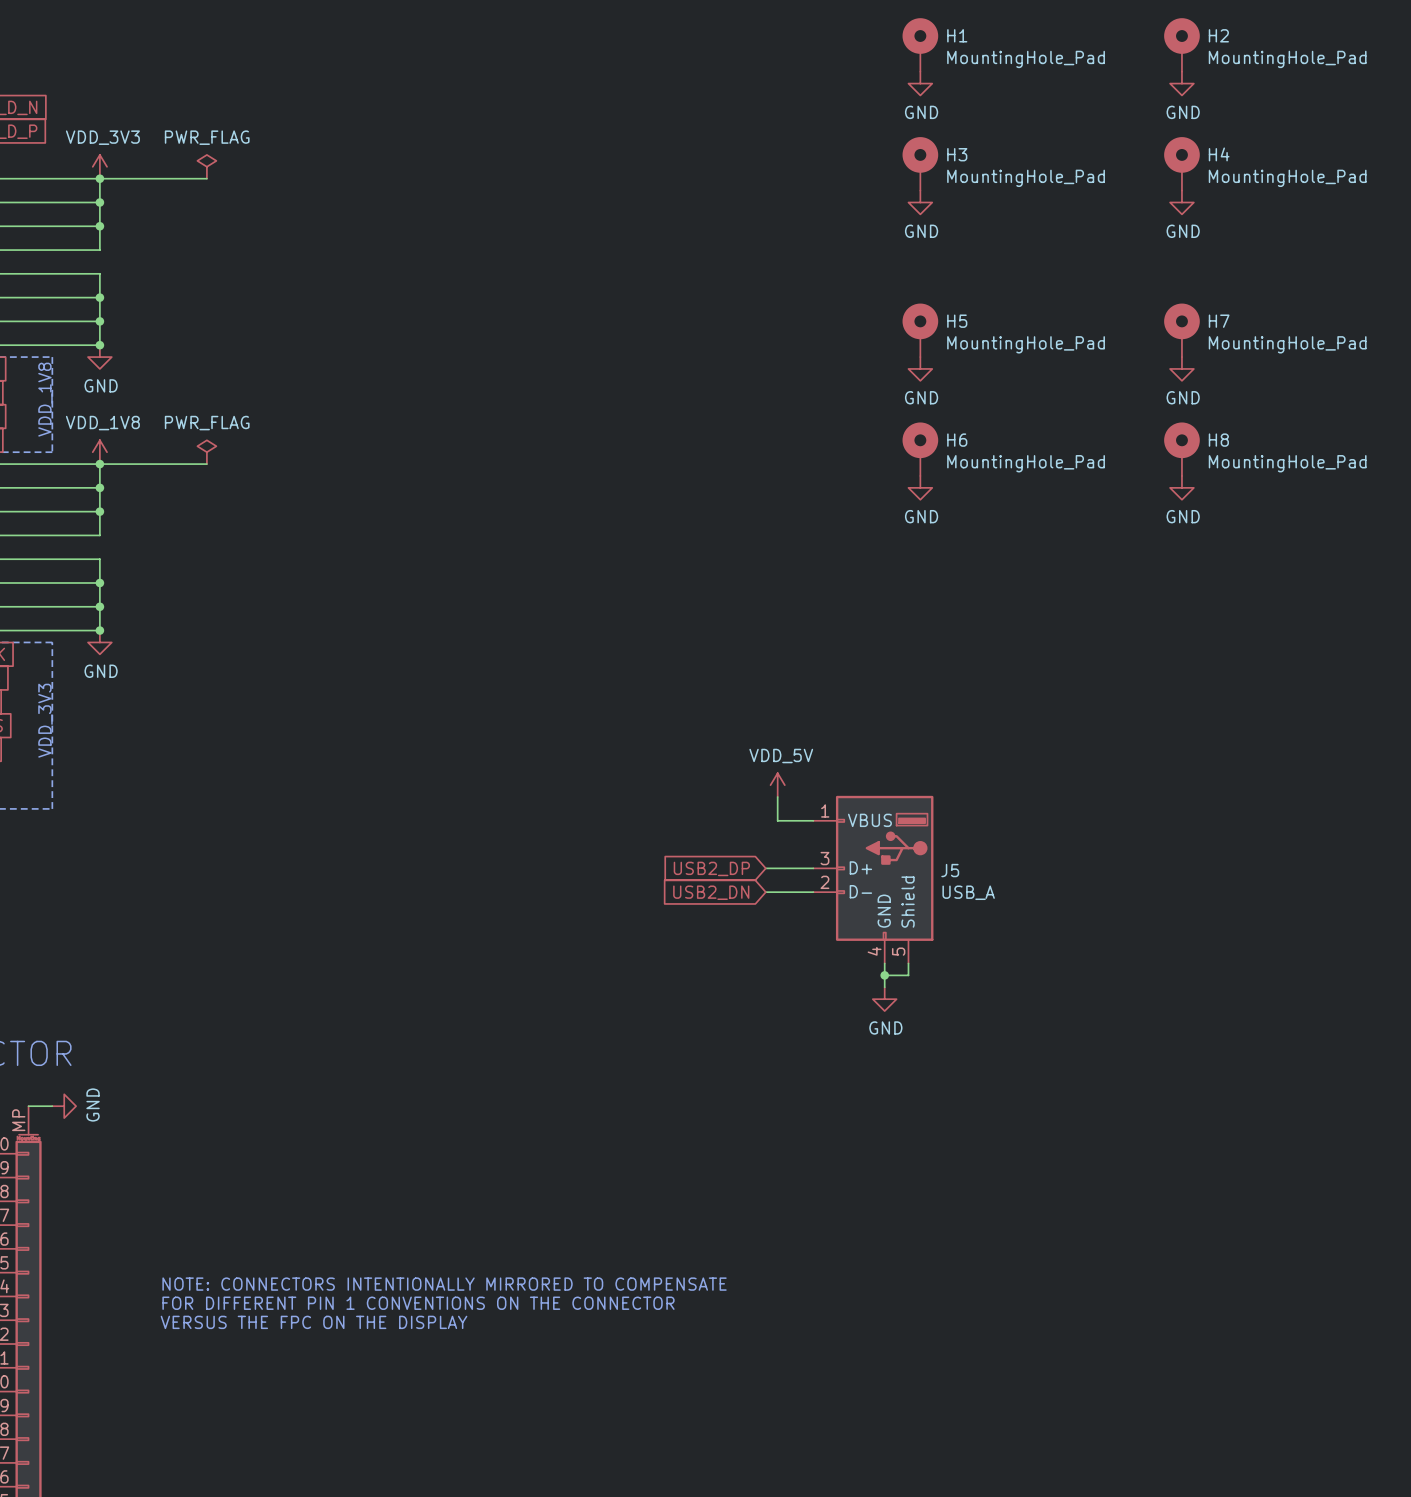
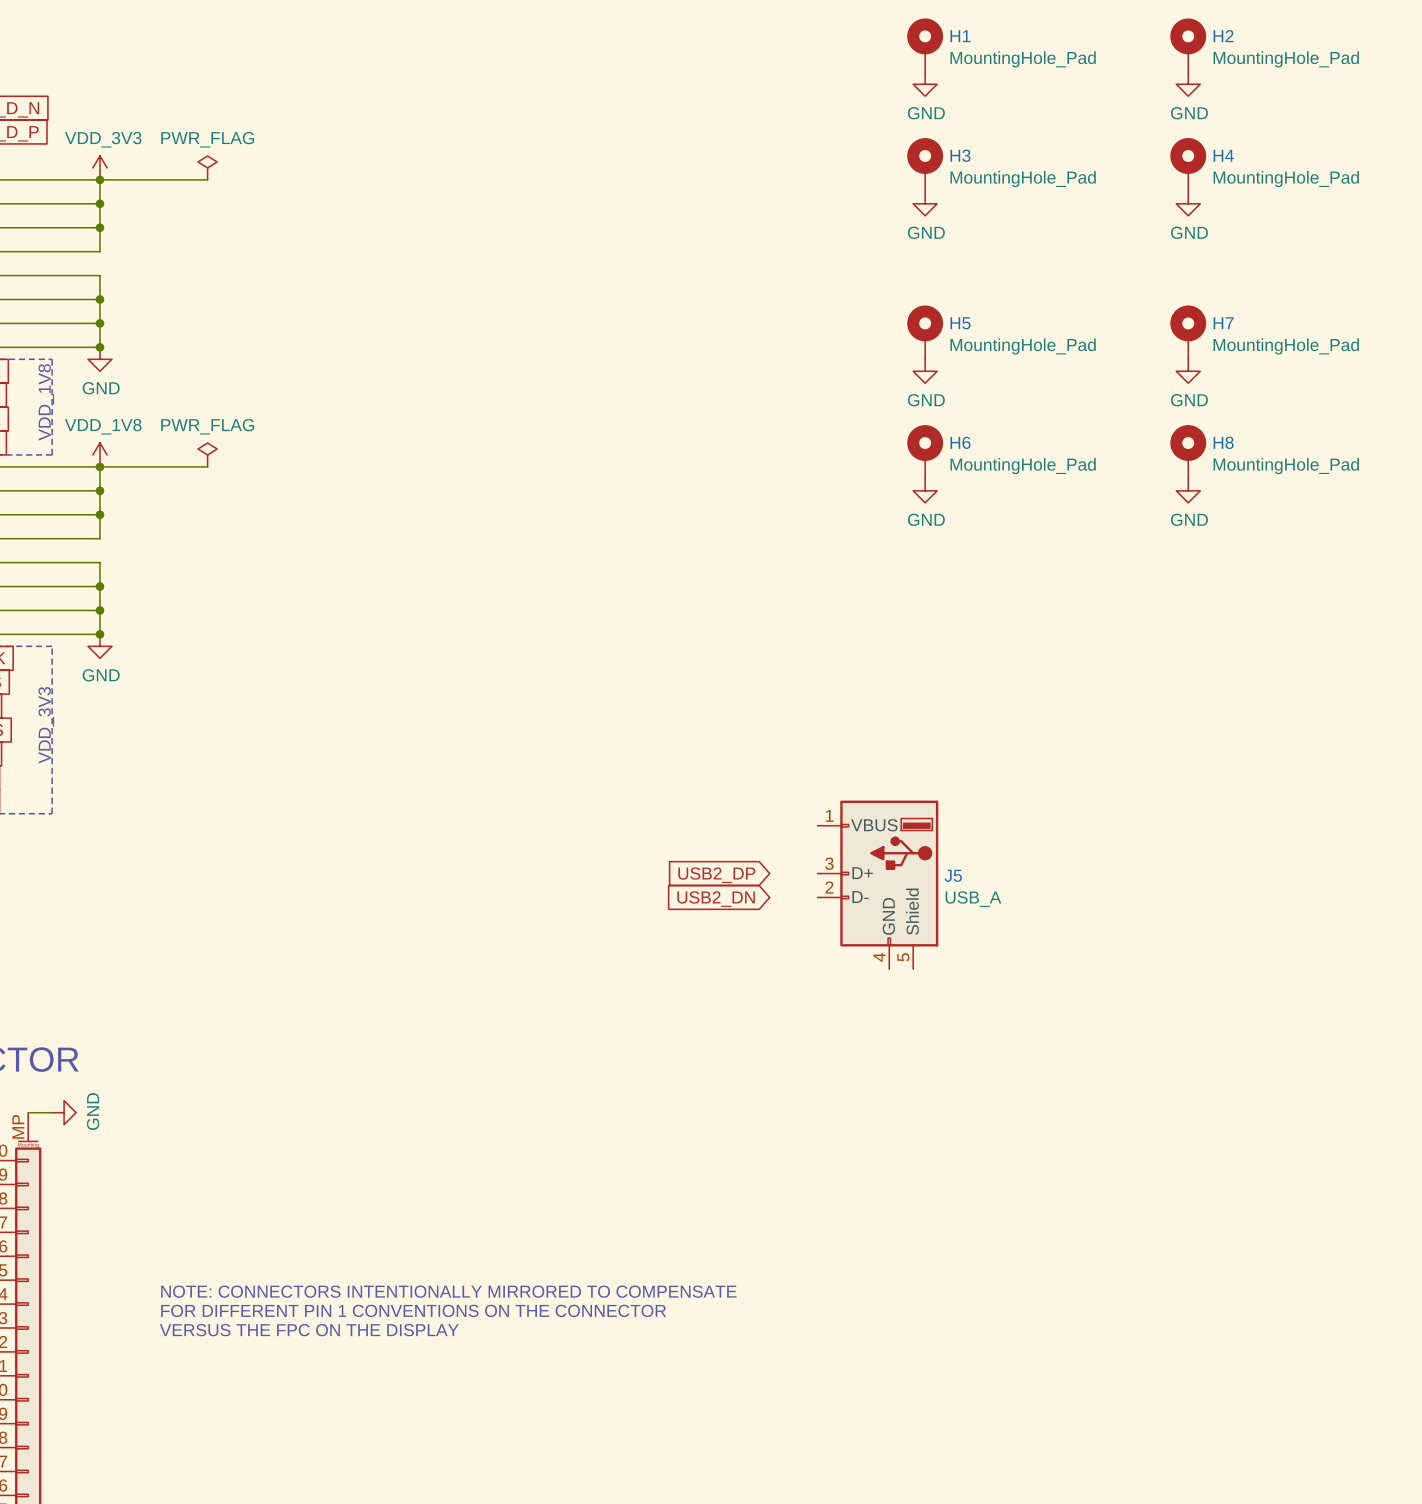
power symbol: VDD_5V (777, 785) -> none
wire: (777, 797) (777, 820) (813, 820) -> none
wire: (765, 868) (813, 868) -> none
wire: (765, 892) (813, 892) -> none
wire: (884, 963) (884, 987) -> none
wire: (908, 963) (908, 975) (884, 975) -> none
junction: (884, 975) -> none
power symbol: GND (884, 999) -> none

